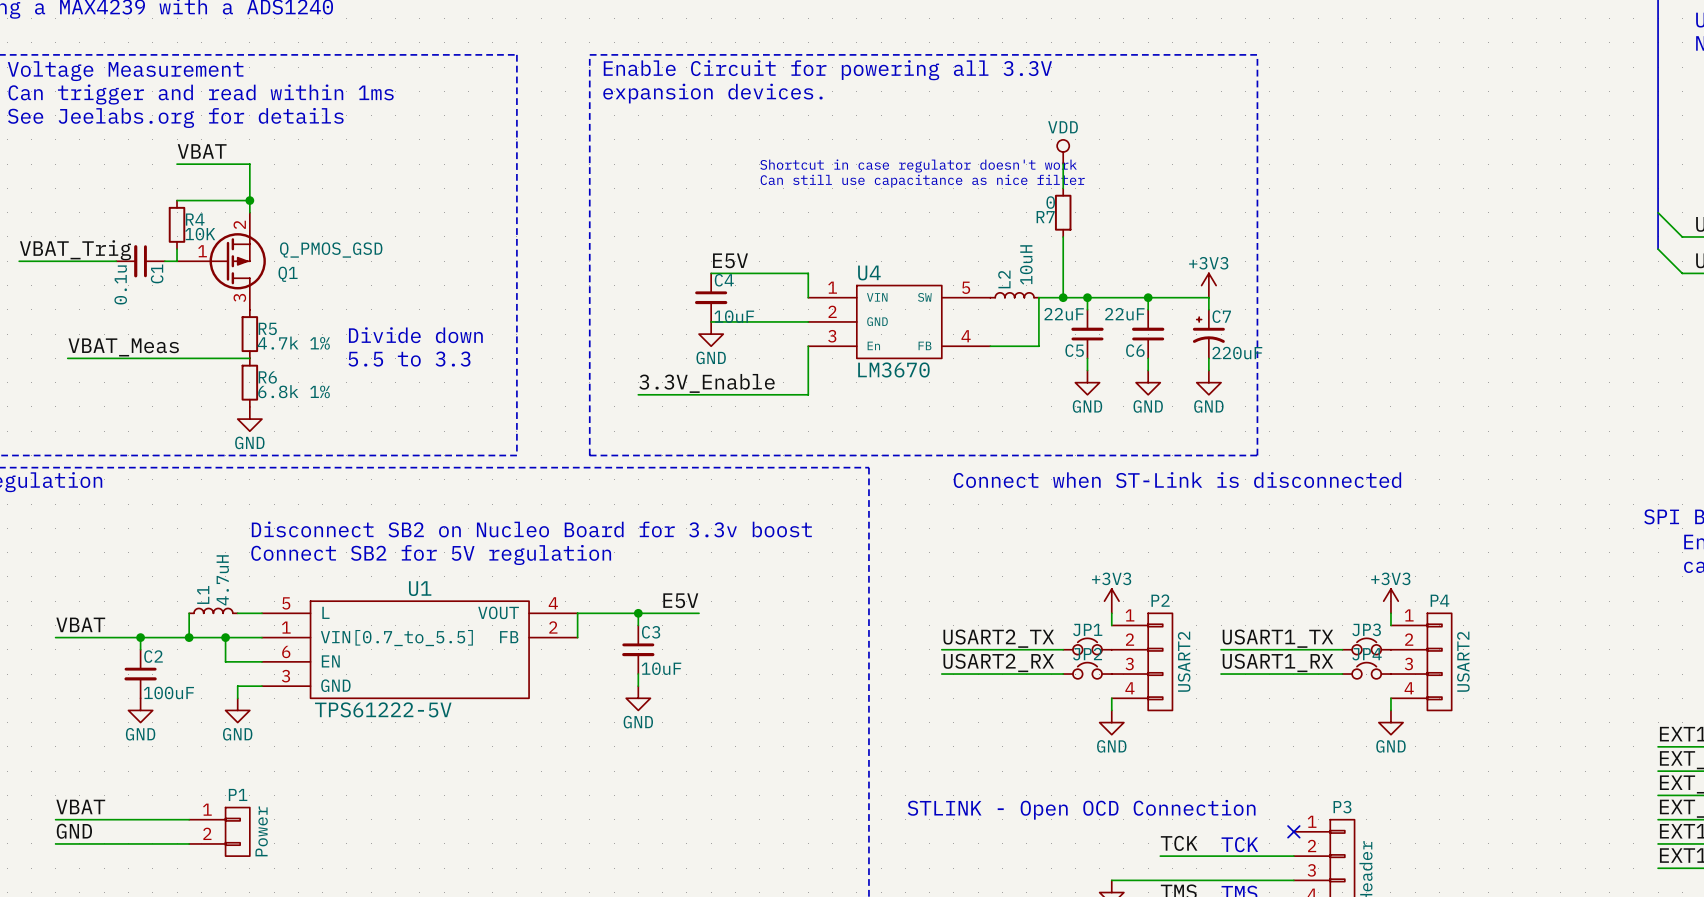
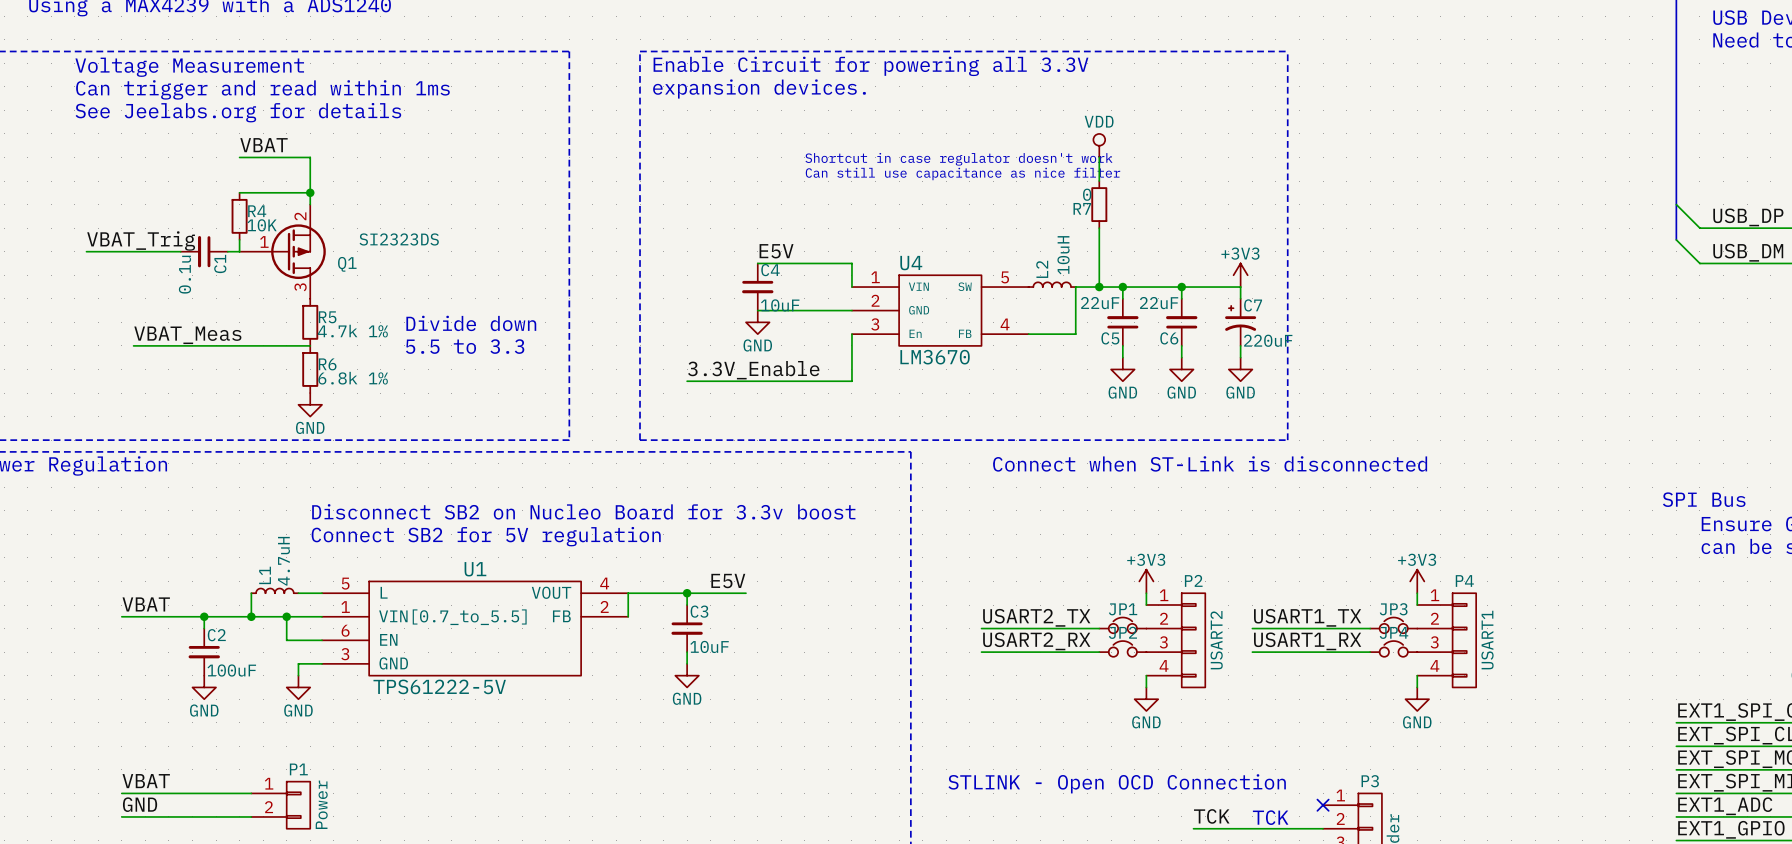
Q1 value: Q_PMOS_GSD (331, 250) -> SI2323DS (399, 239)
P4 value: USART2 (1463, 661) -> USART1 (1487, 640)

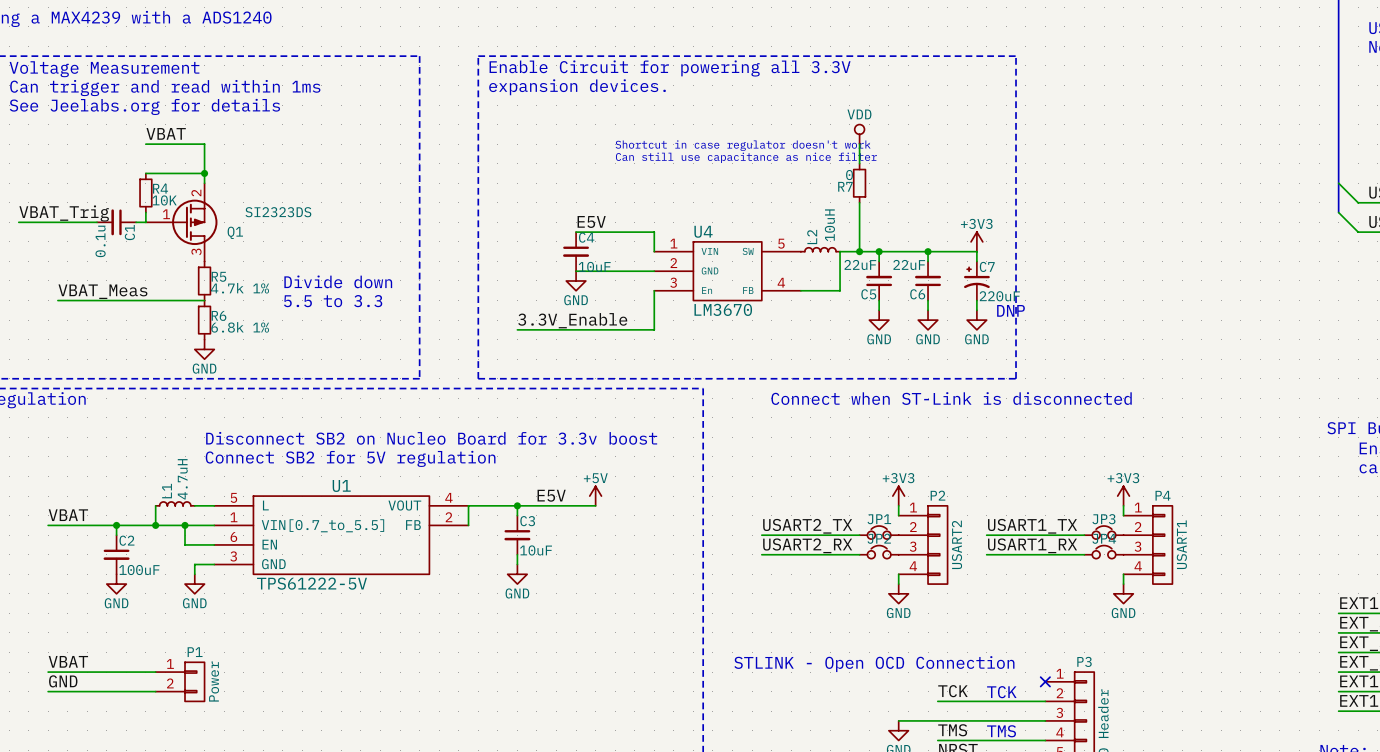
text: none -> DNP (1010, 310)
power symbol: none -> +5V (595, 496)
wire: none -> (566, 505) (595, 505)

